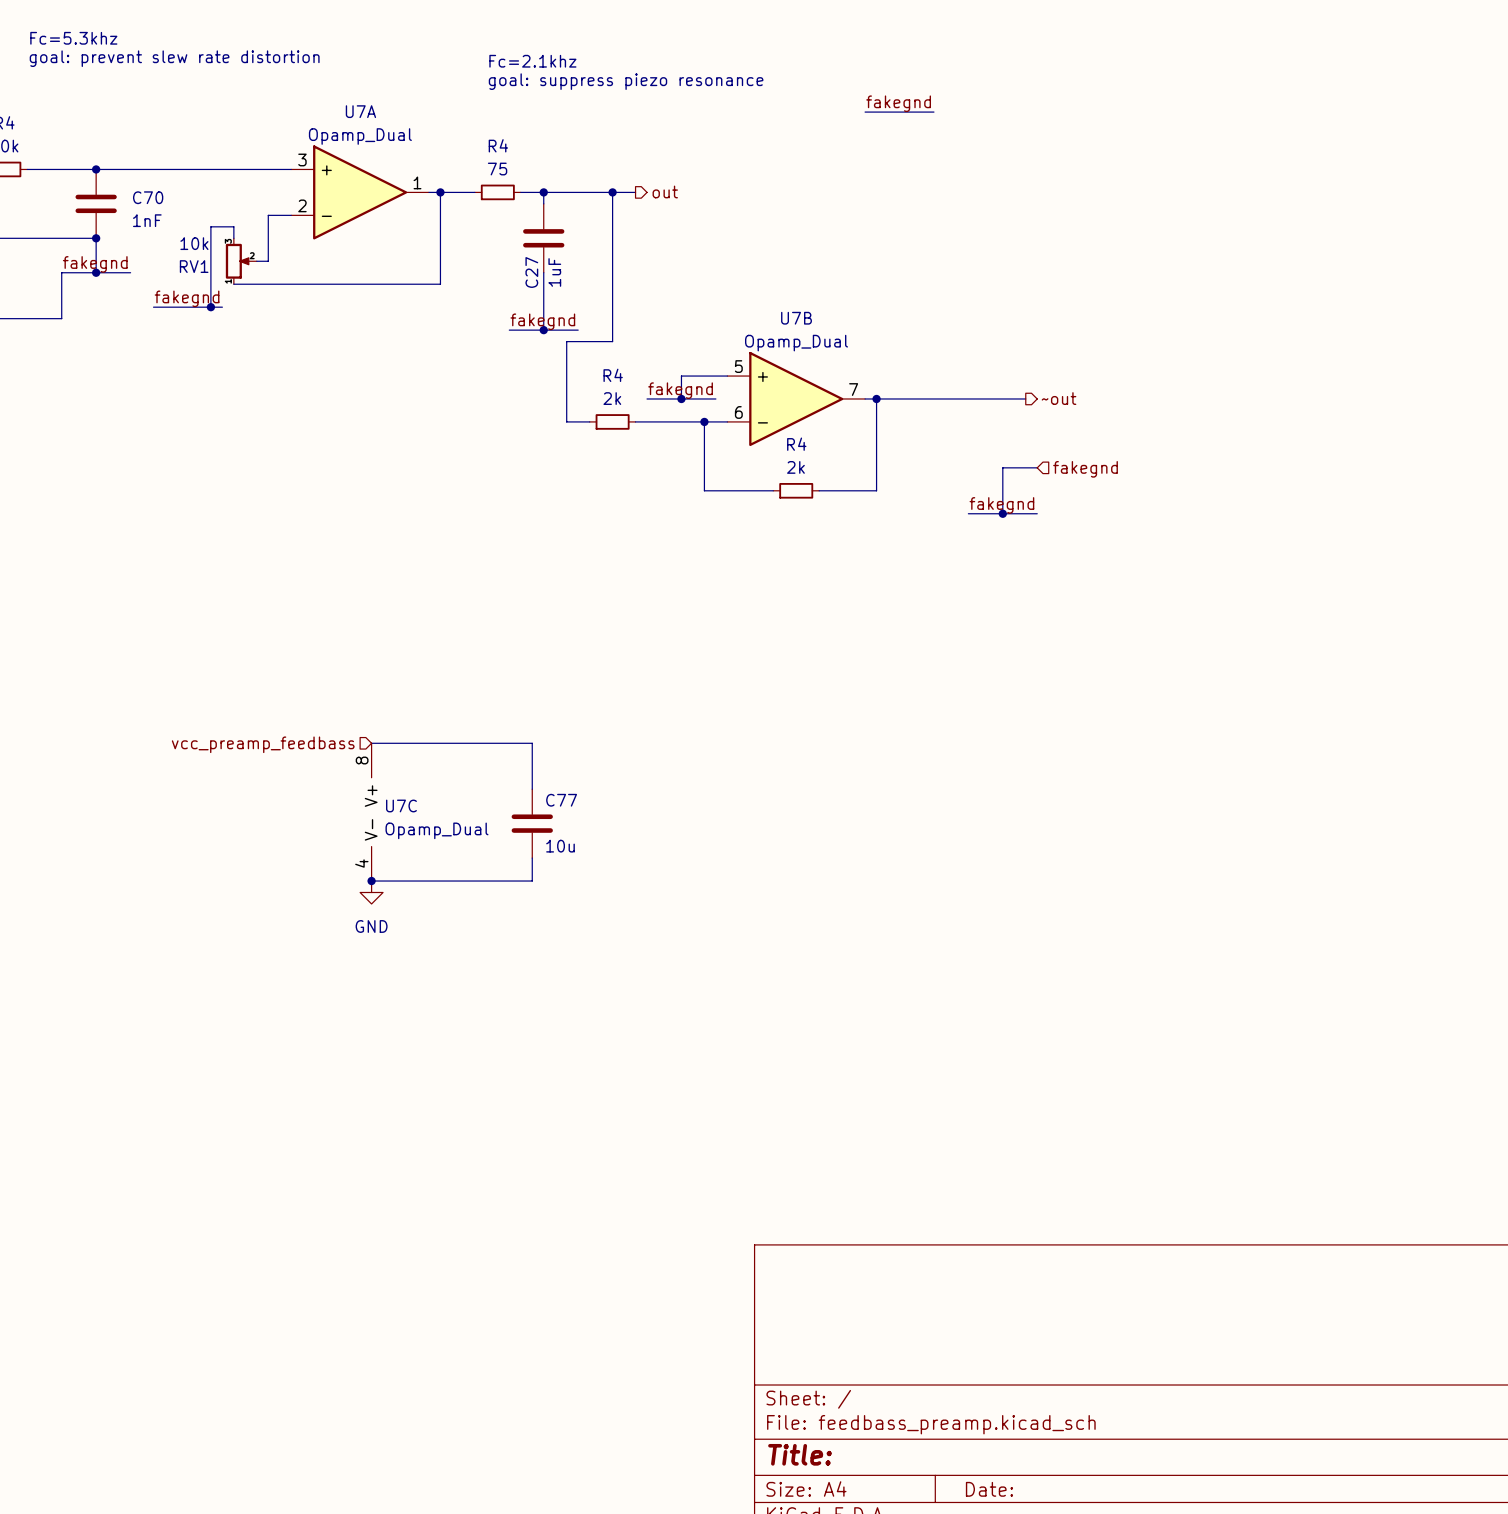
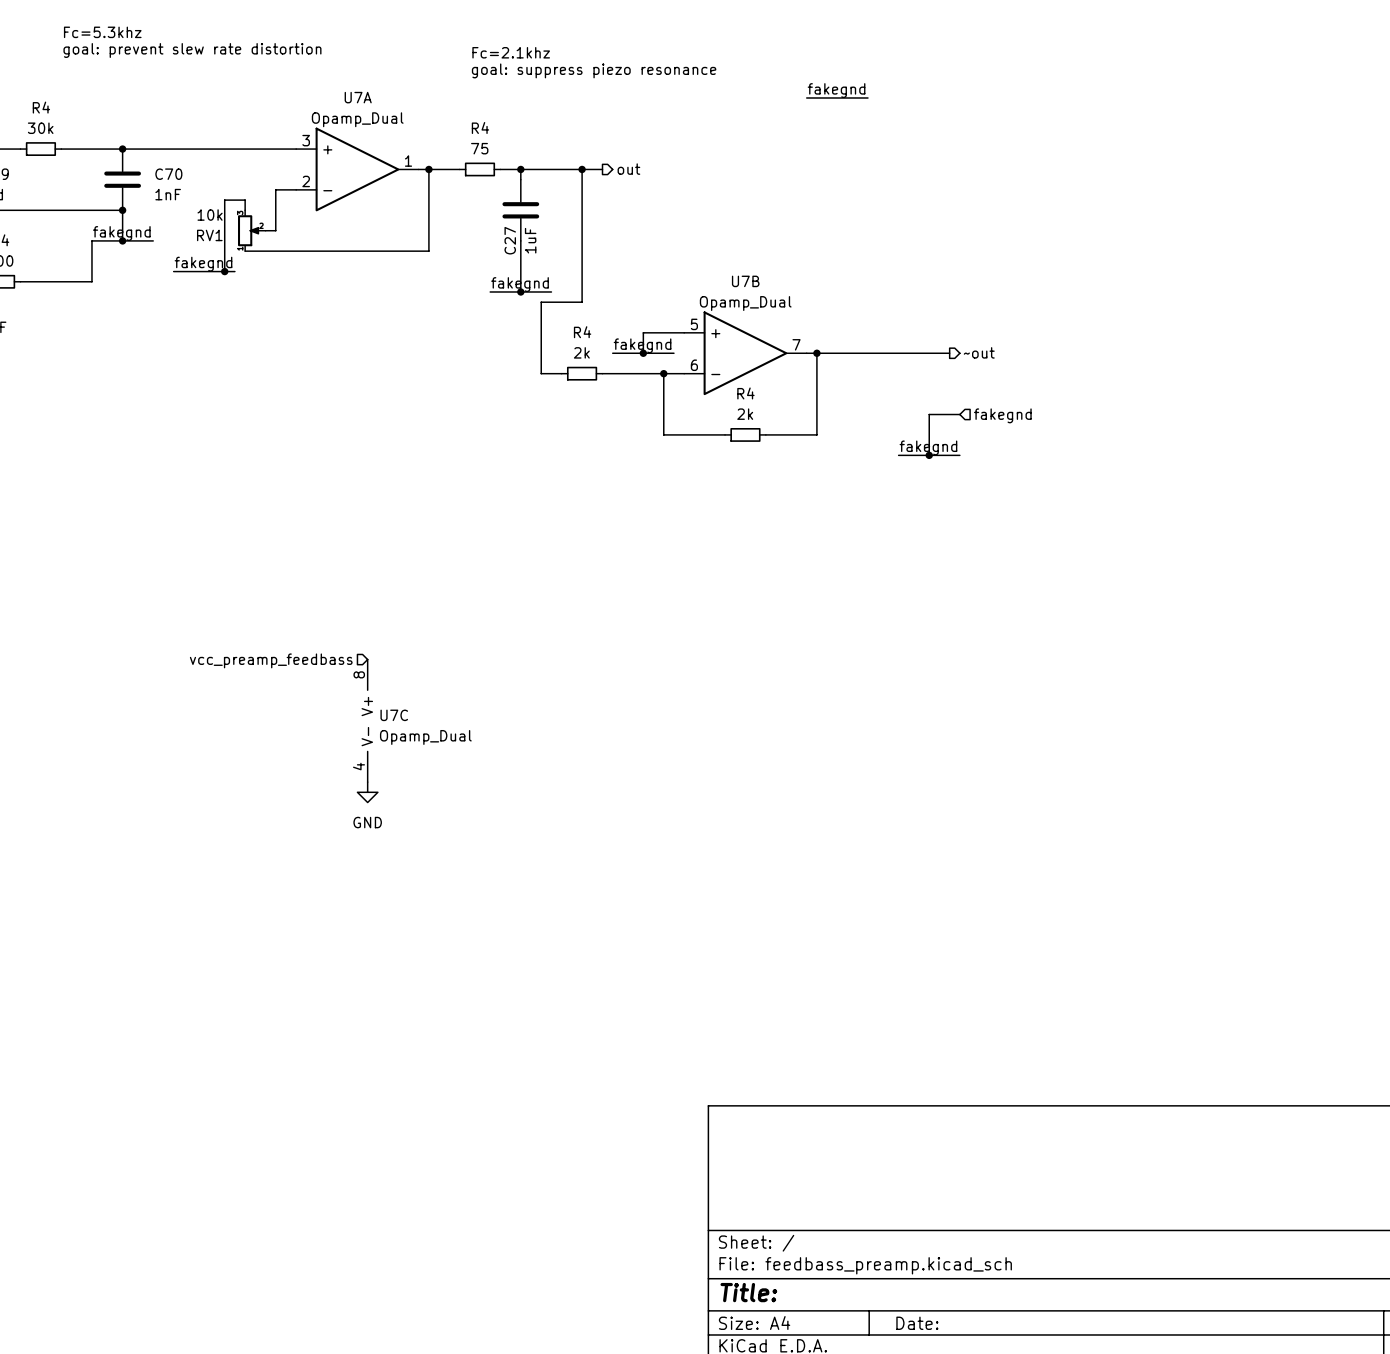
wire: (371, 743) (532, 743) (532, 789) -> none
C77: 10u (532, 823) -> none
wire: (532, 858) (532, 881) (371, 881) -> none
junction: (371, 881) -> none

